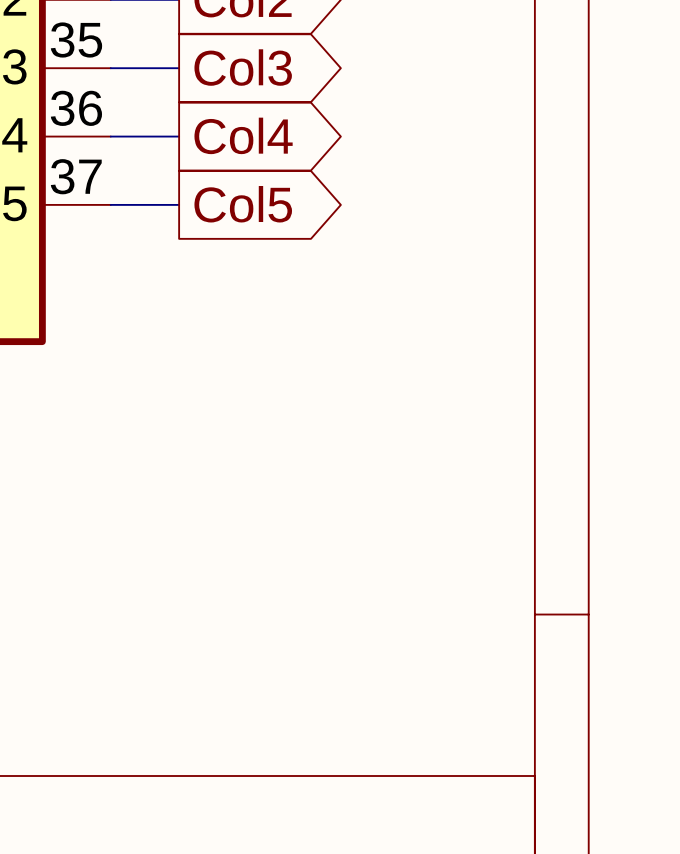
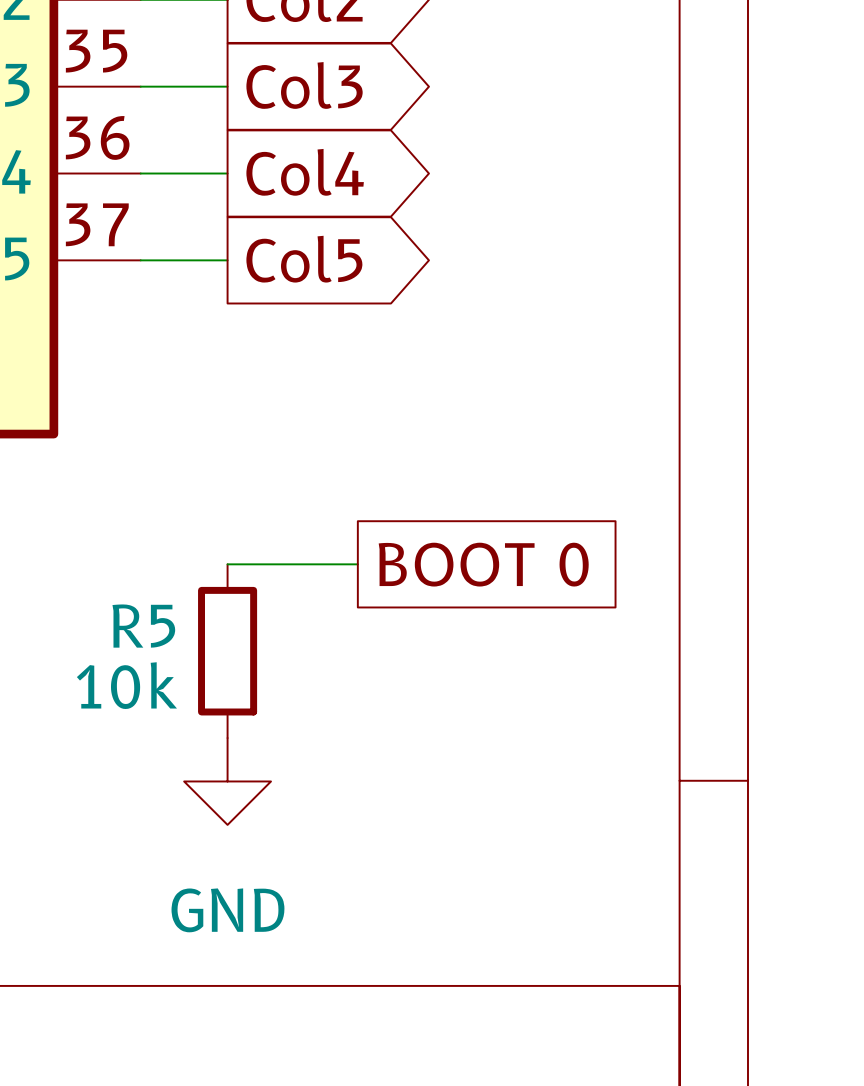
wire: none -> (227, 564) (357, 564)
global label: none -> BOOT 0 (483, 564)
R5: none -> 10k (227, 651)
power symbol: none -> GND (227, 781)

